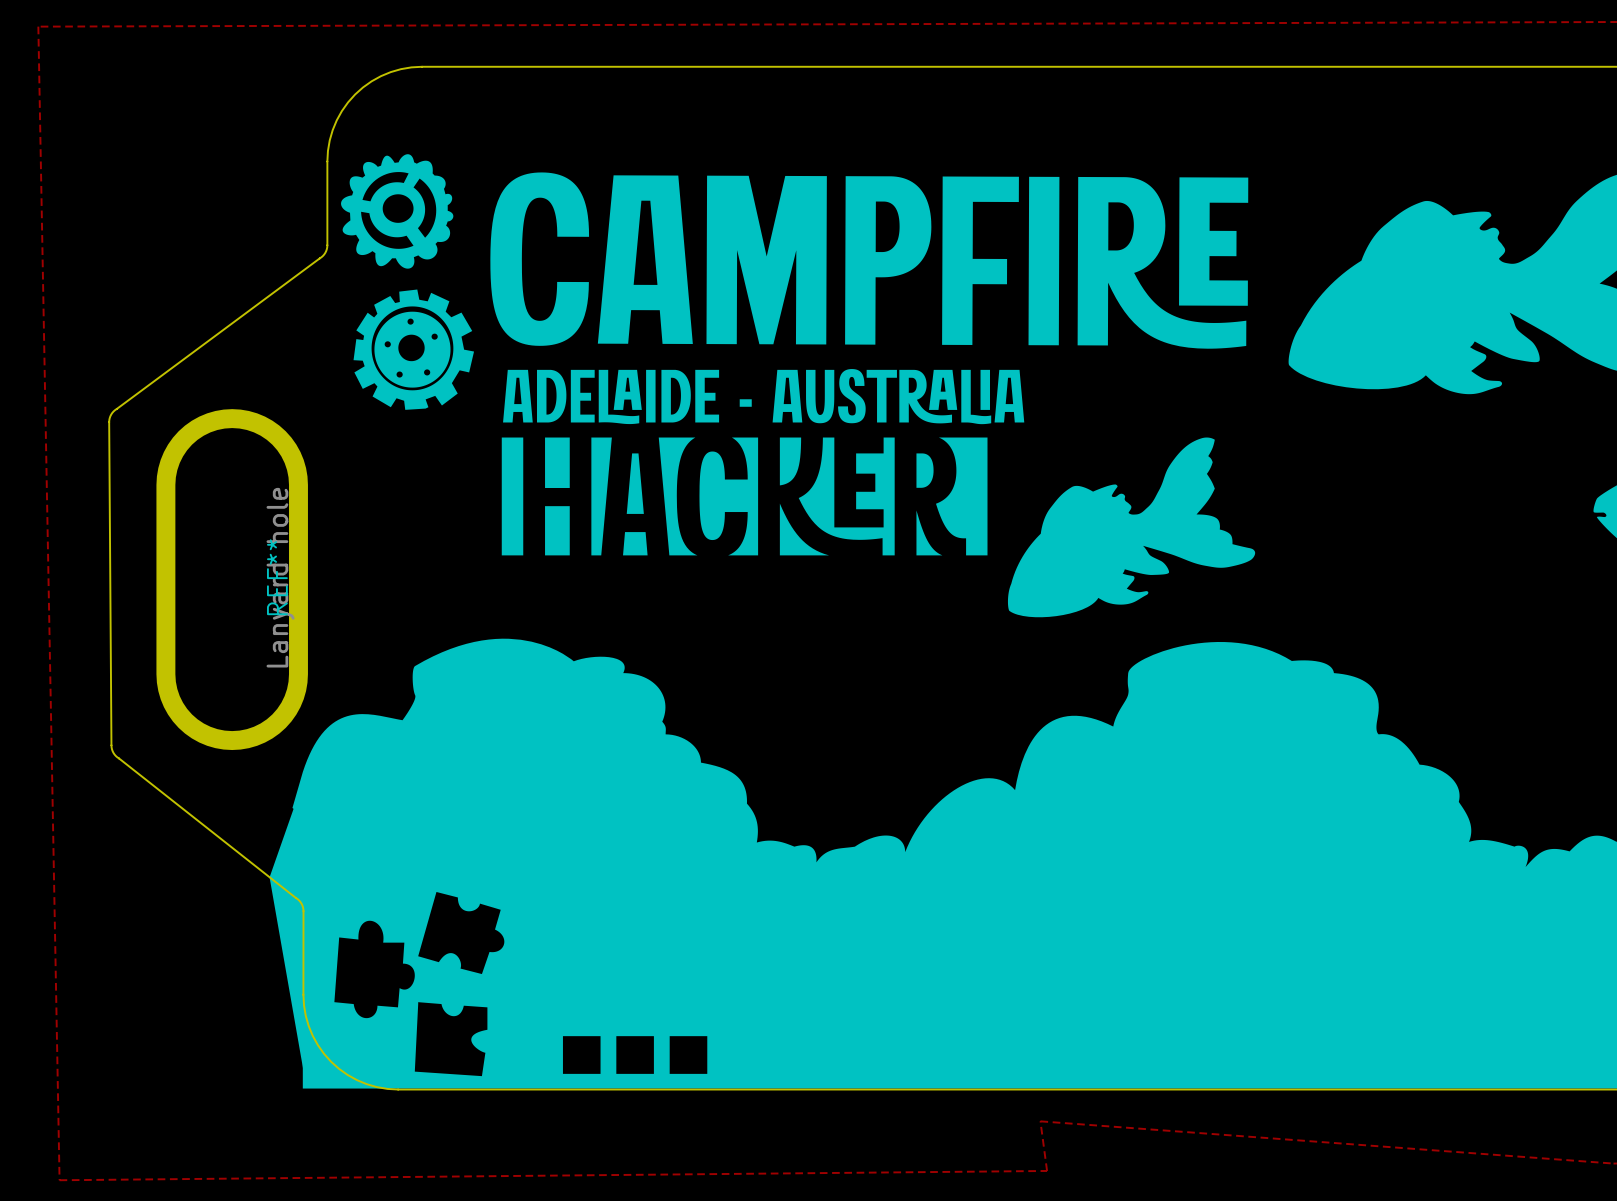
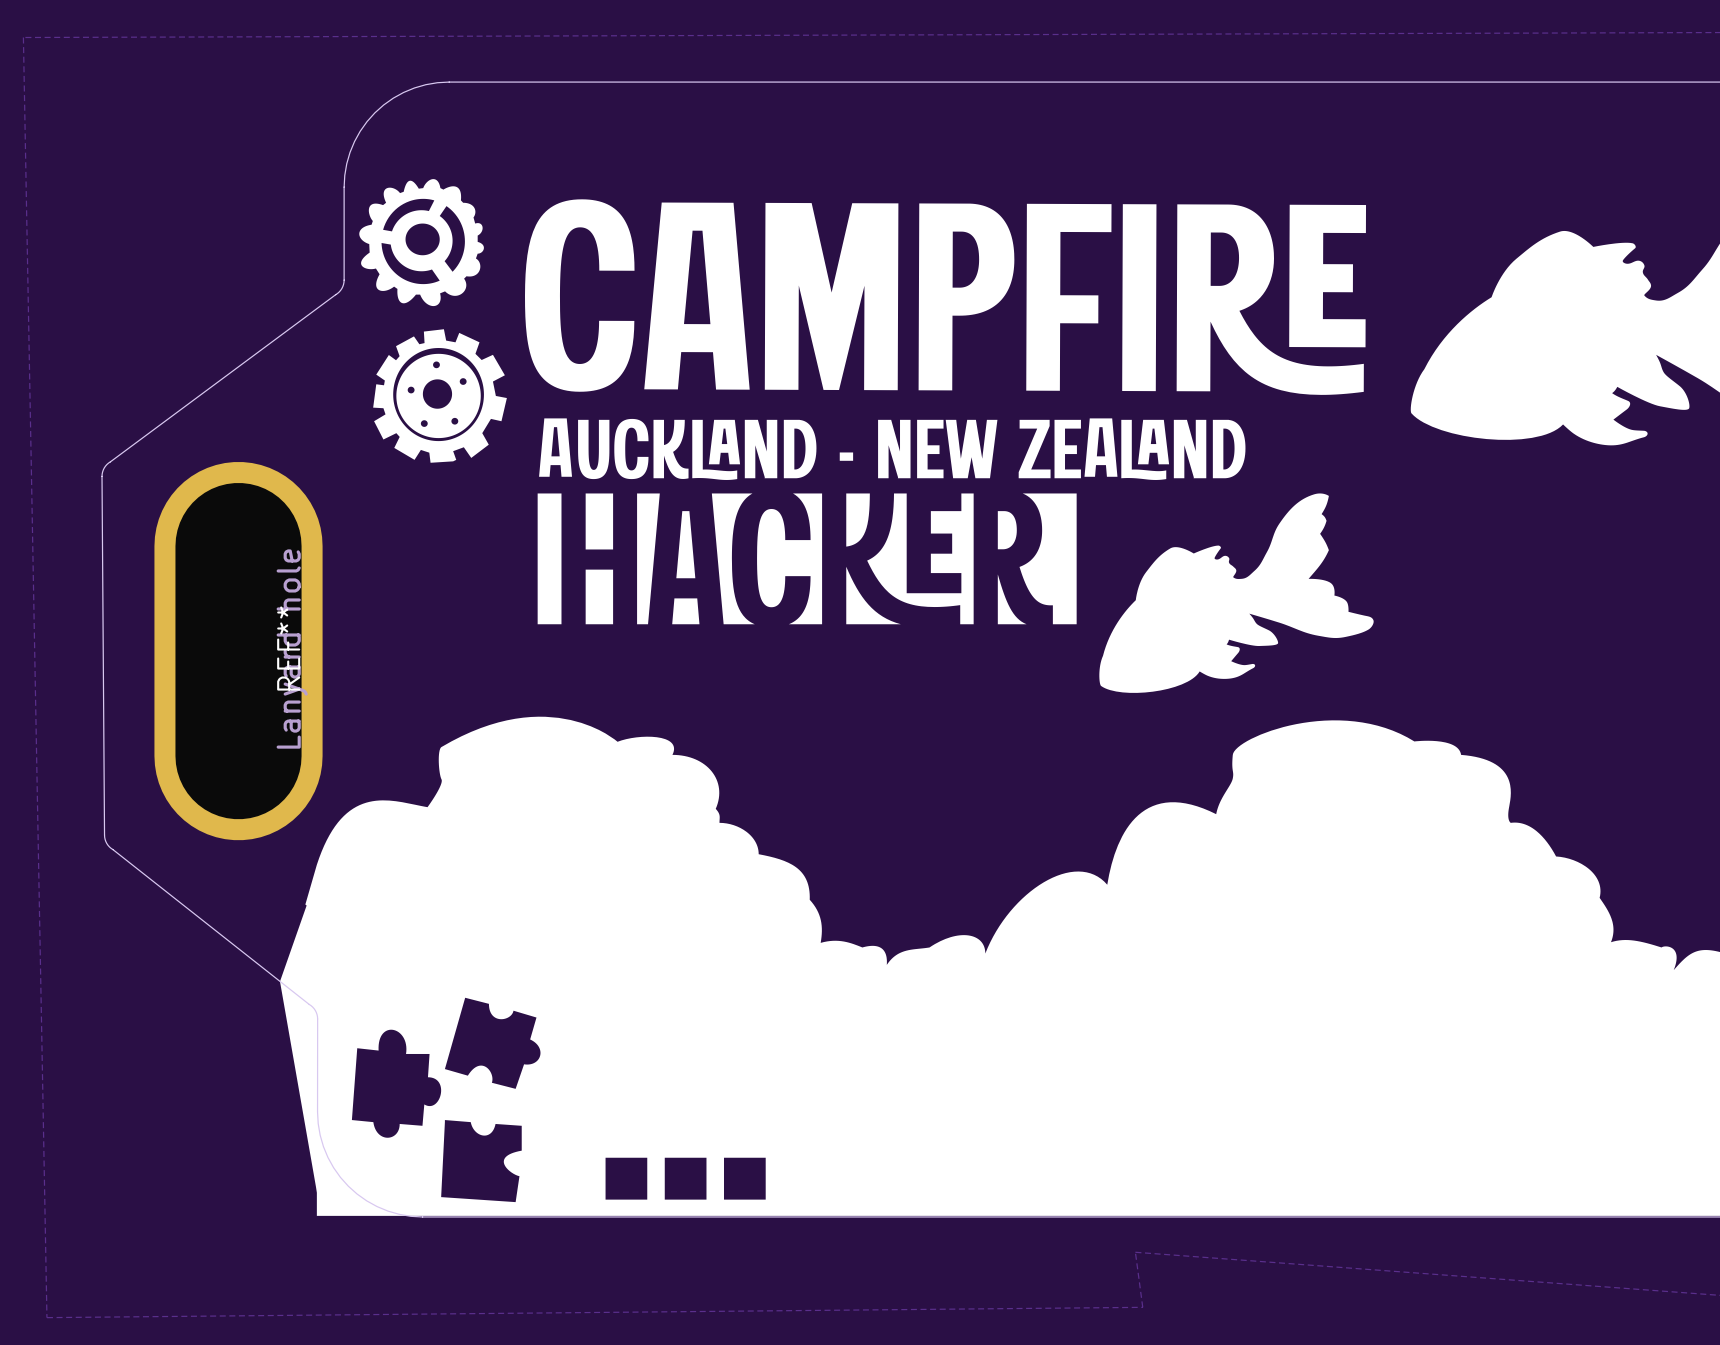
drawing: [537, 369, 567, 423] -> none
drawing shape: [570, 369, 595, 423] -> [614, 418, 649, 480]
drawing: [646, 369, 656, 423] -> none
drawing shape: [695, 369, 720, 423] -> [744, 419, 778, 479]
drawing: [772, 369, 803, 423] -> none
drawing shape: [838, 369, 866, 424] -> [917, 419, 944, 479]
drawing shape: [866, 369, 897, 423] -> [945, 419, 998, 479]
drawing: [899, 369, 953, 424] -> none
drawing shape: [961, 369, 992, 425] -> [1054, 419, 1081, 479]
drawing: [980, 369, 991, 410] -> none
drawing: none -> [653, 419, 689, 479]
drawing: none -> [878, 419, 911, 479]
drawing: none -> [1018, 419, 1051, 479]
drawing: none -> [1121, 419, 1246, 480]
drawing position: (627, 389) -> (724, 442)
drawing position: (943, 389) -> (1153, 442)
drawing position: (618, 396) -> (714, 449)
drawing position: (676, 396) -> (800, 449)
drawing position: (820, 396) -> (593, 449)
drawing position: (745, 403) -> (846, 456)

